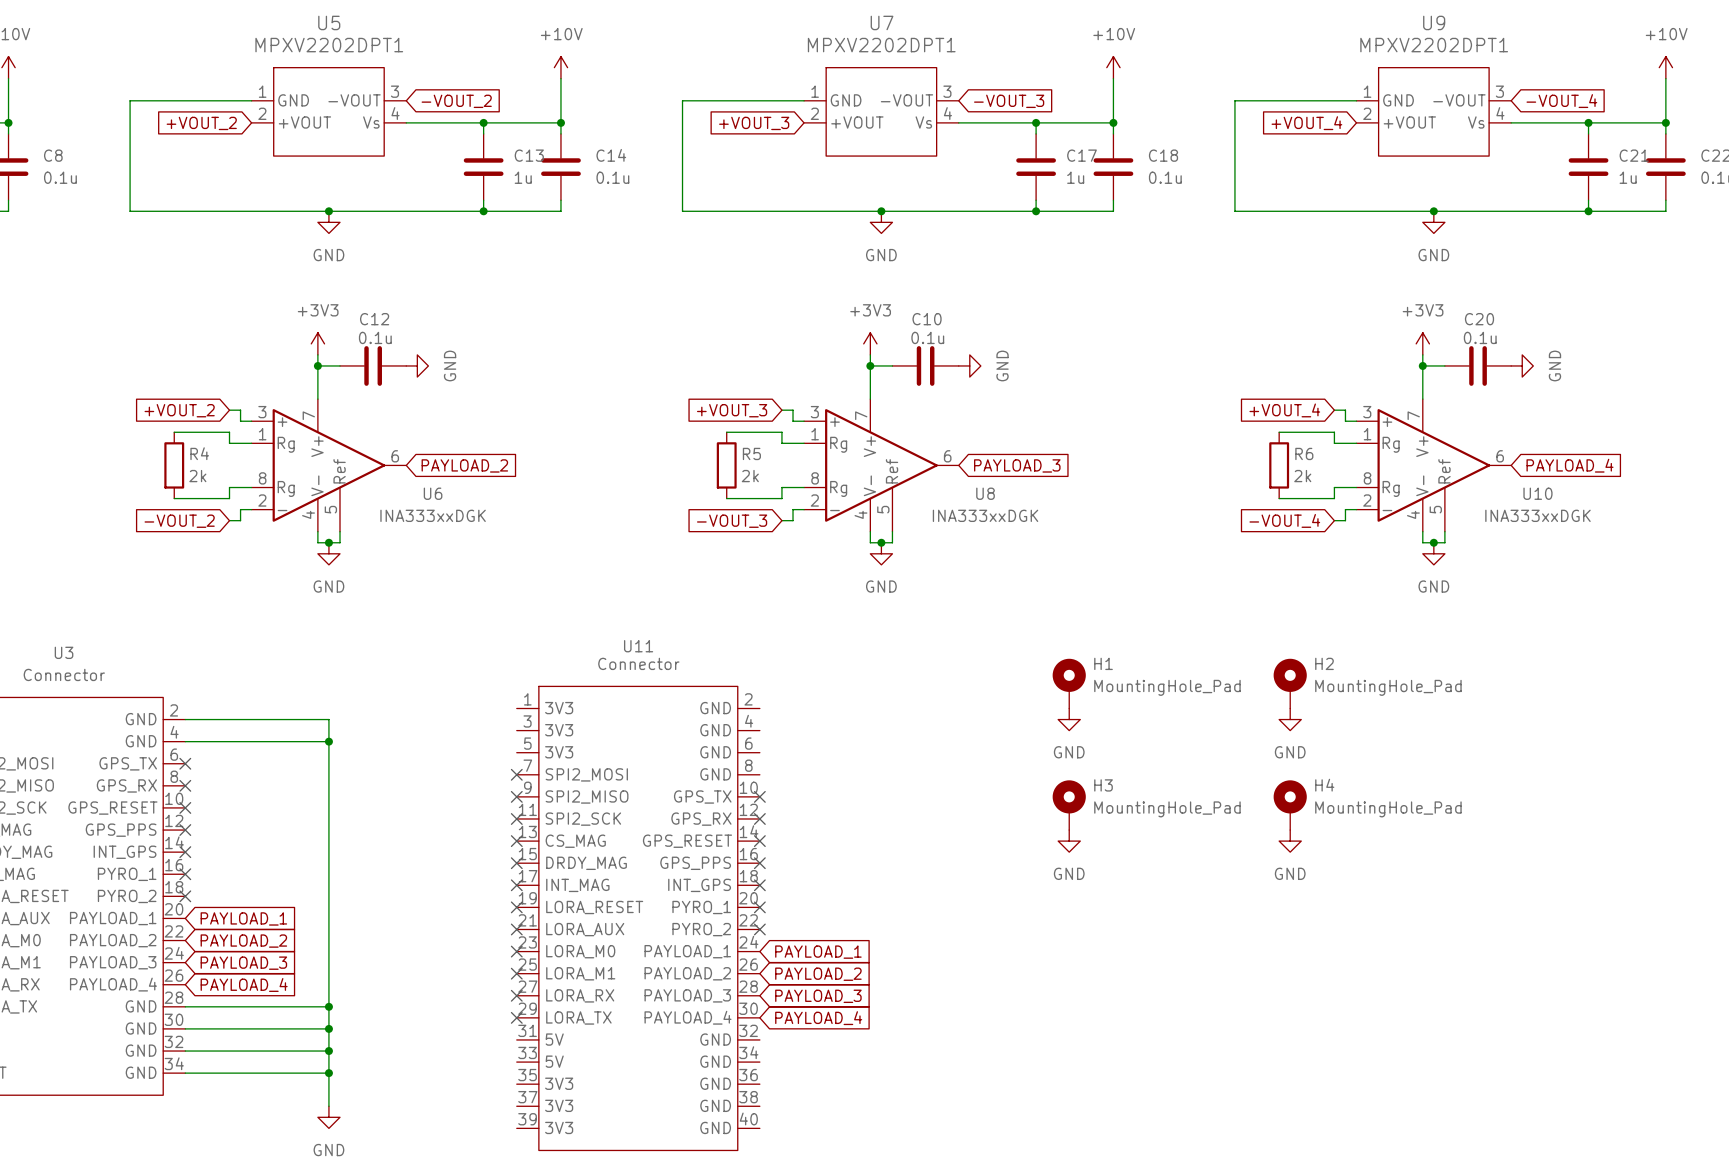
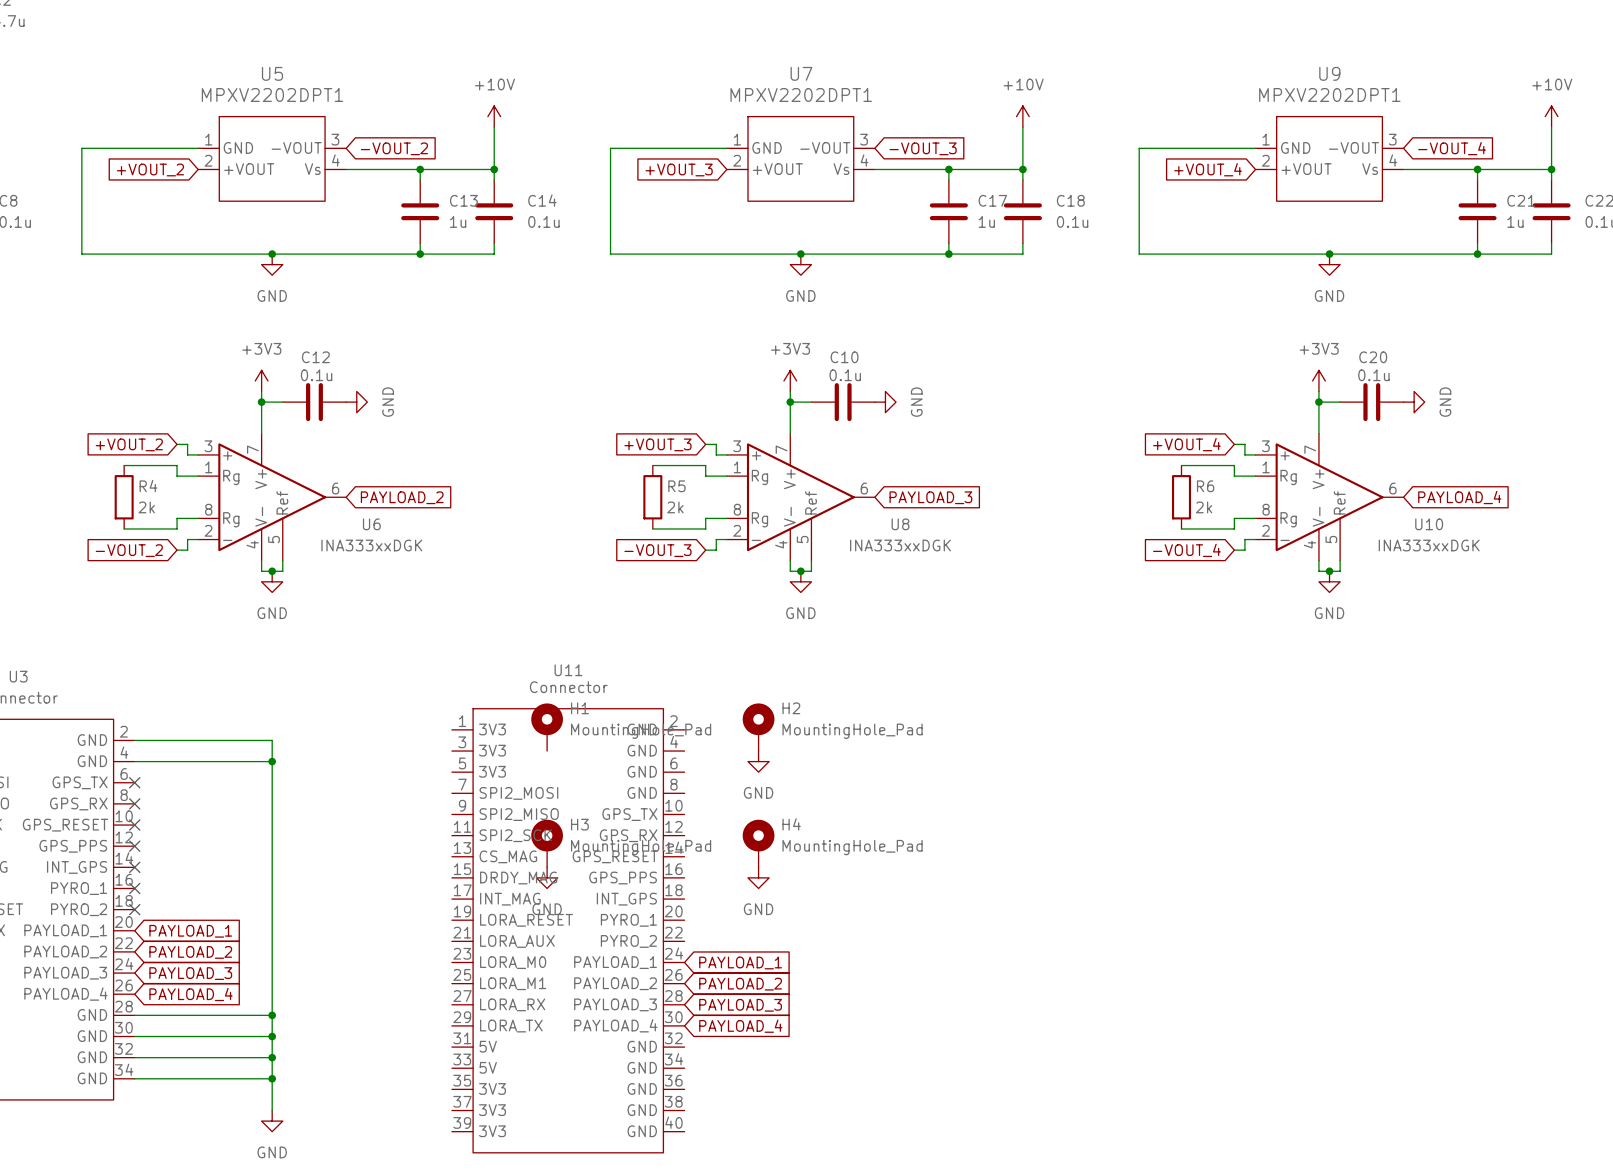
H1 position: (1069, 683) -> (547, 727)
H2 position: (1290, 683) -> (758, 727)
power symbol: GND (1069, 719) -> none
power symbol: GND (1290, 719) -> none
power symbol: none -> GND (758, 761)
no-connect mark: (516, 774) -> none
no-connect mark: (516, 796) -> none
no-connect mark: (759, 796) -> none
H3 position: (1069, 805) -> (547, 843)
H4 position: (1290, 805) -> (758, 843)
no-connect mark: (516, 818) -> none
no-connect mark: (759, 818) -> none
no-connect mark: (516, 841) -> none
no-connect mark: (759, 841) -> none
power symbol: GND (1069, 841) -> none
power symbol: GND (1290, 841) -> none
no-connect mark: (516, 863) -> none
power symbol: none -> GND (547, 877)
no-connect mark: (759, 863) -> none
power symbol: none -> GND (758, 877)
no-connect mark: (516, 885) -> none
no-connect mark: (759, 885) -> none
no-connect mark: (516, 907) -> none
no-connect mark: (759, 907) -> none
no-connect mark: (516, 929) -> none
no-connect mark: (759, 929) -> none
no-connect mark: (516, 951) -> none
no-connect mark: (516, 973) -> none
no-connect mark: (516, 995) -> none
no-connect mark: (516, 1017) -> none

